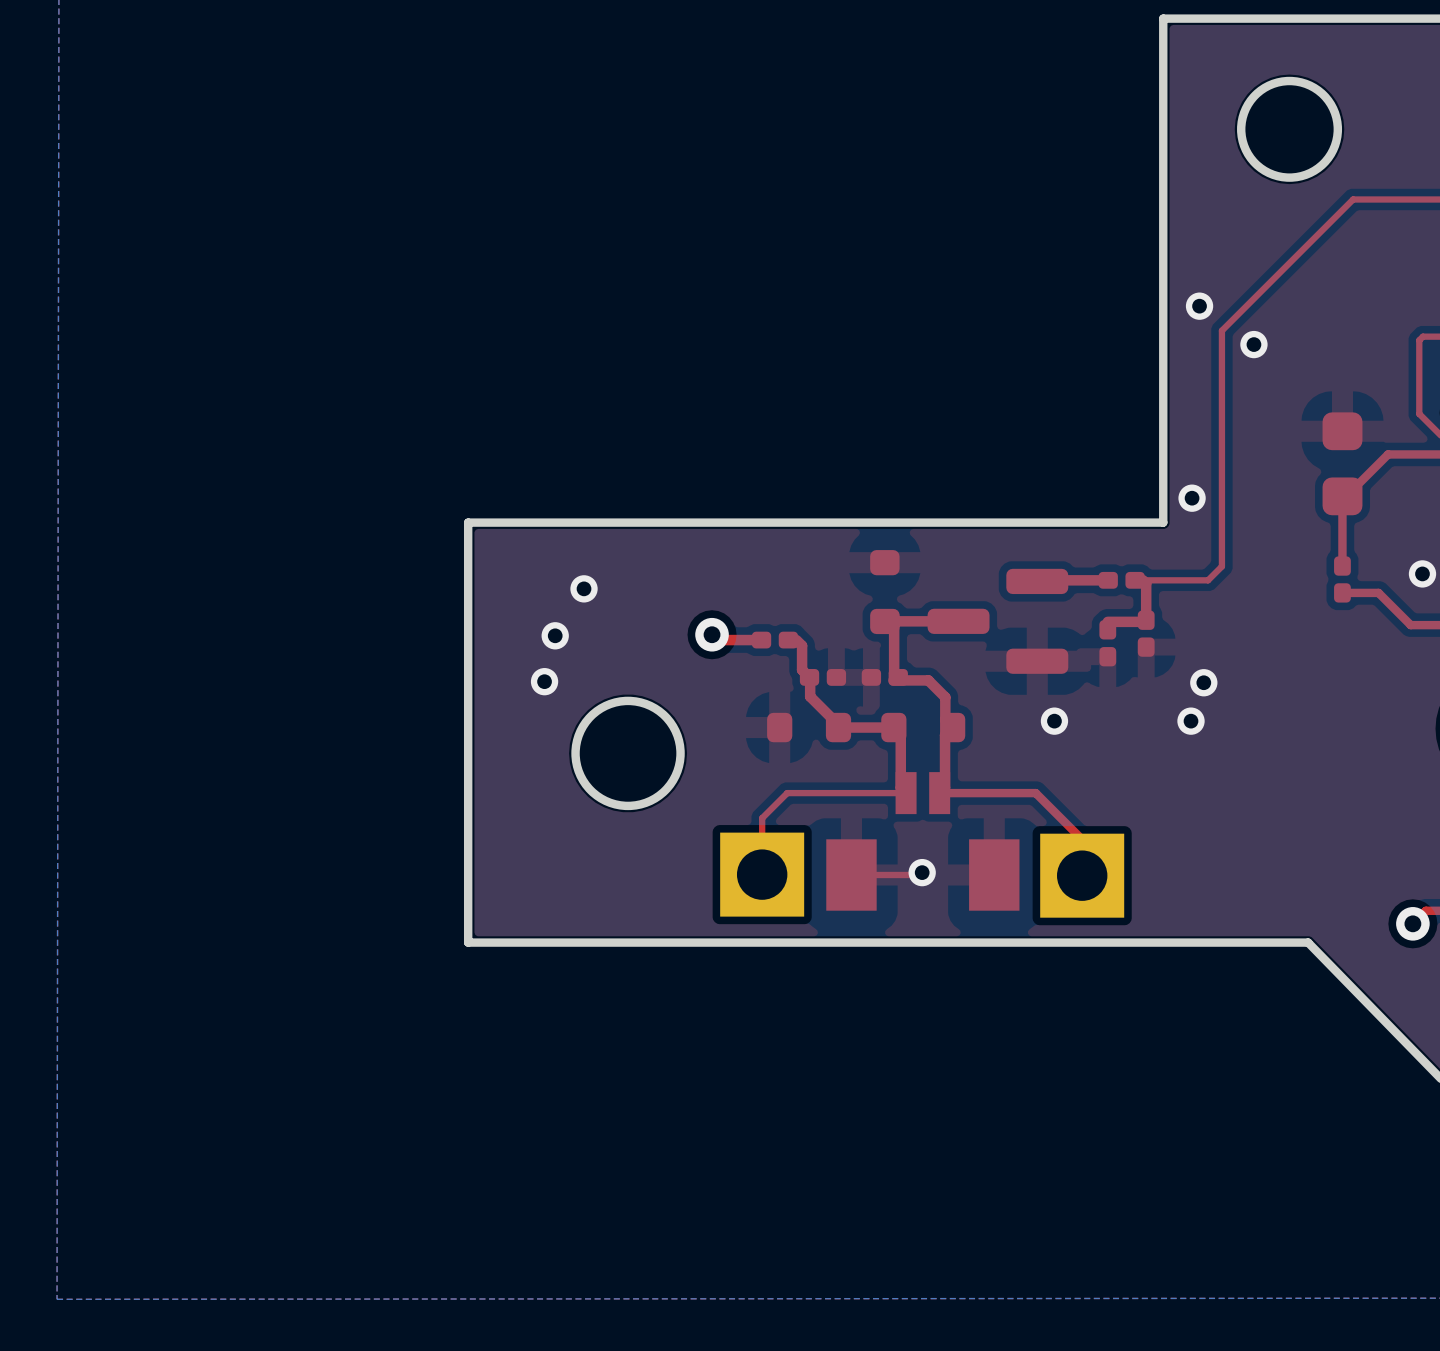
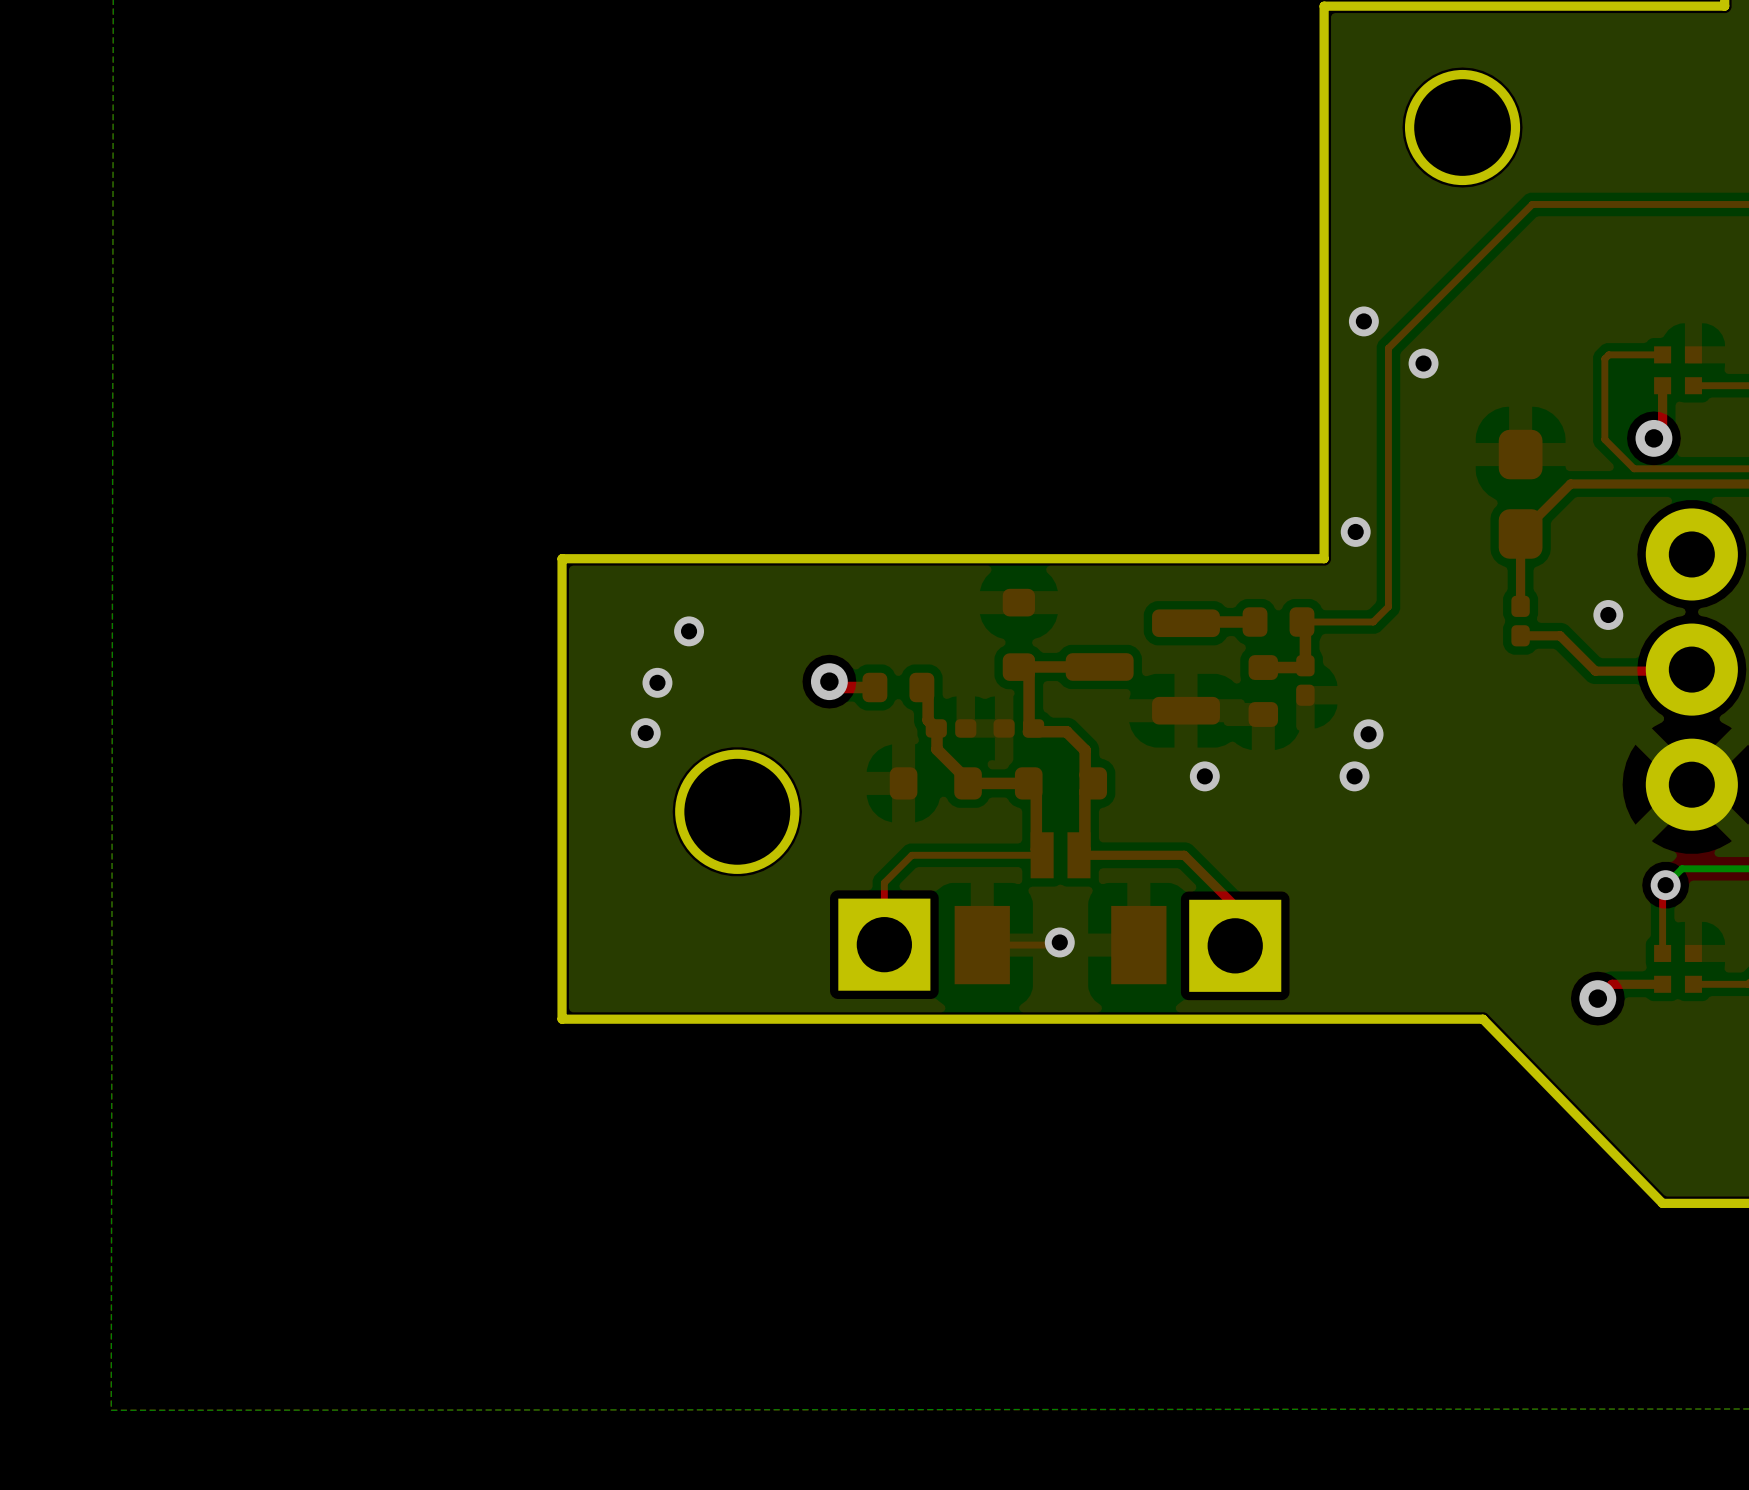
part footprint: [1322, 412, 1363, 516] -> [1498, 429, 1543, 559]
part footprint: [1098, 571, 1145, 589] -> [1242, 607, 1315, 637]
part footprint: [1099, 620, 1117, 667] -> [1248, 655, 1279, 727]
part footprint: [751, 631, 799, 649] -> [862, 672, 935, 703]

